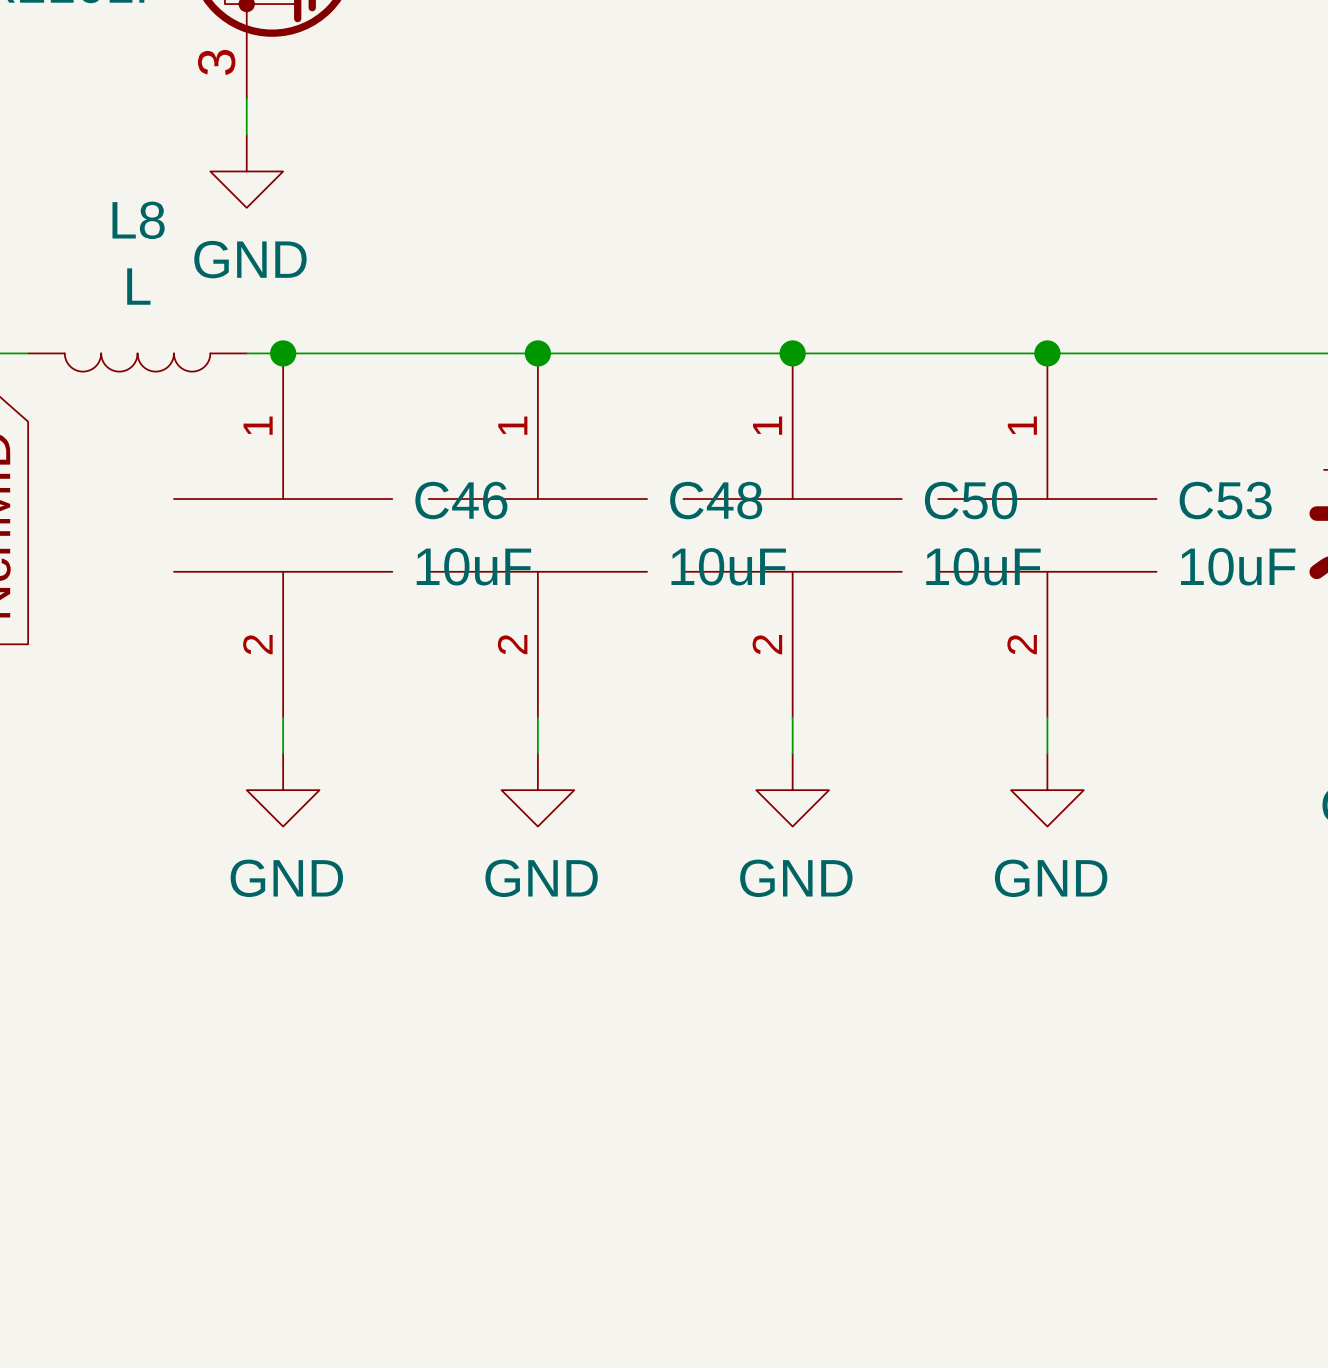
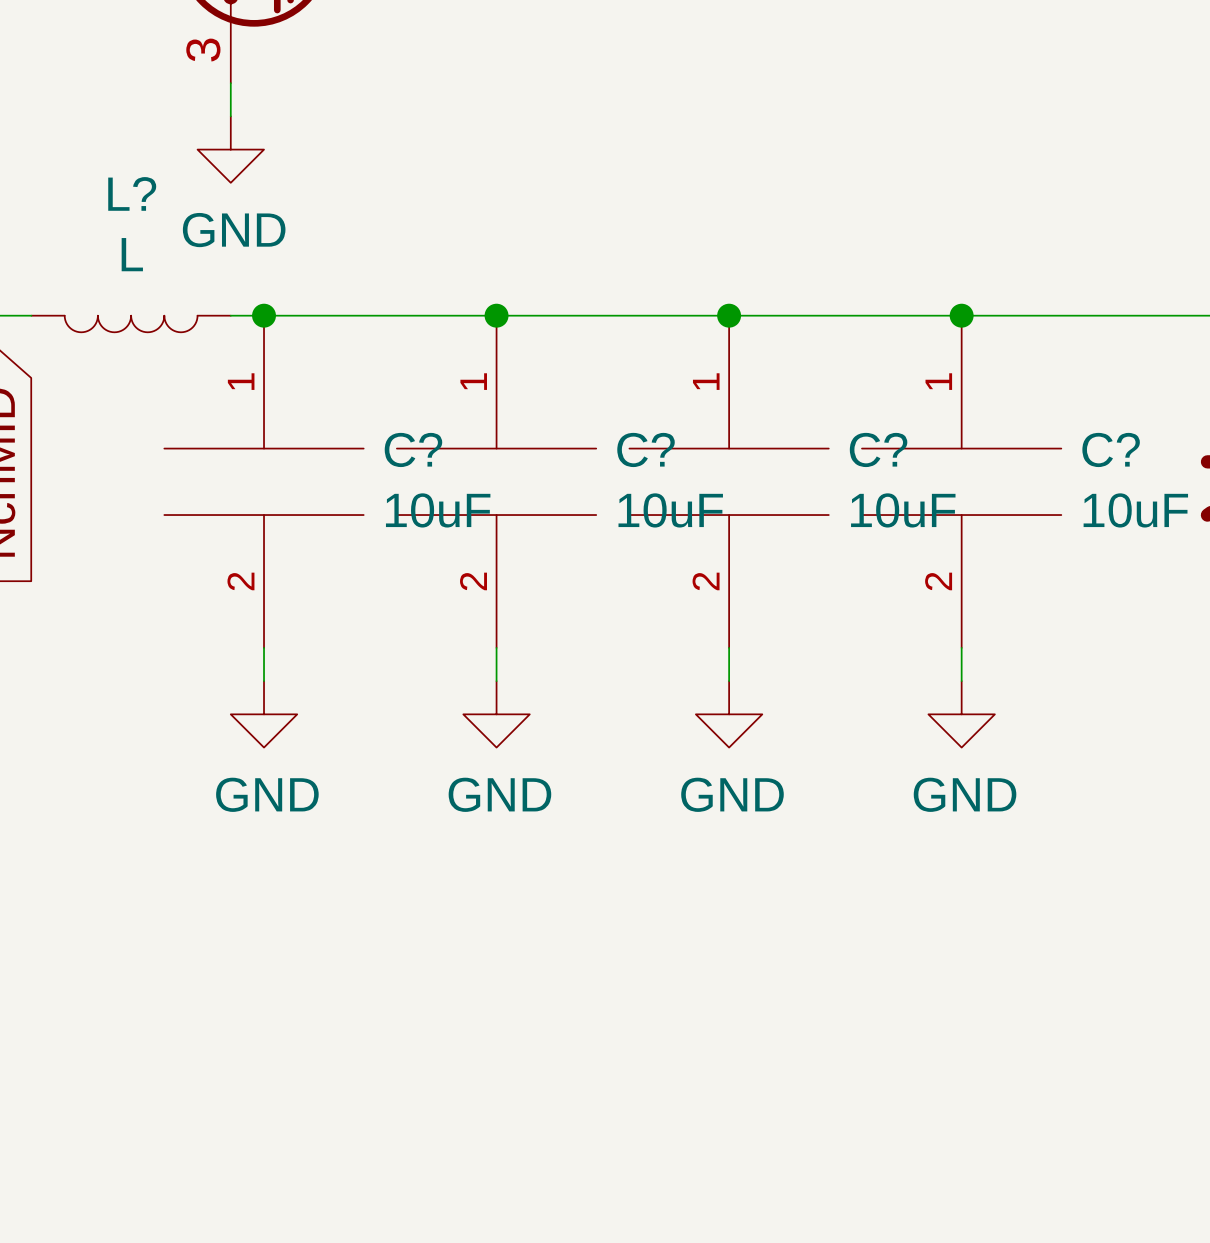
L8 name: L8 (138, 220) -> L? (132, 193)
C46 name: C46 (461, 500) -> C? (413, 449)
C48 name: C48 (716, 500) -> C? (646, 449)
C50 name: C50 (971, 500) -> C? (878, 449)
C53 name: C53 (1225, 500) -> C? (1111, 449)

